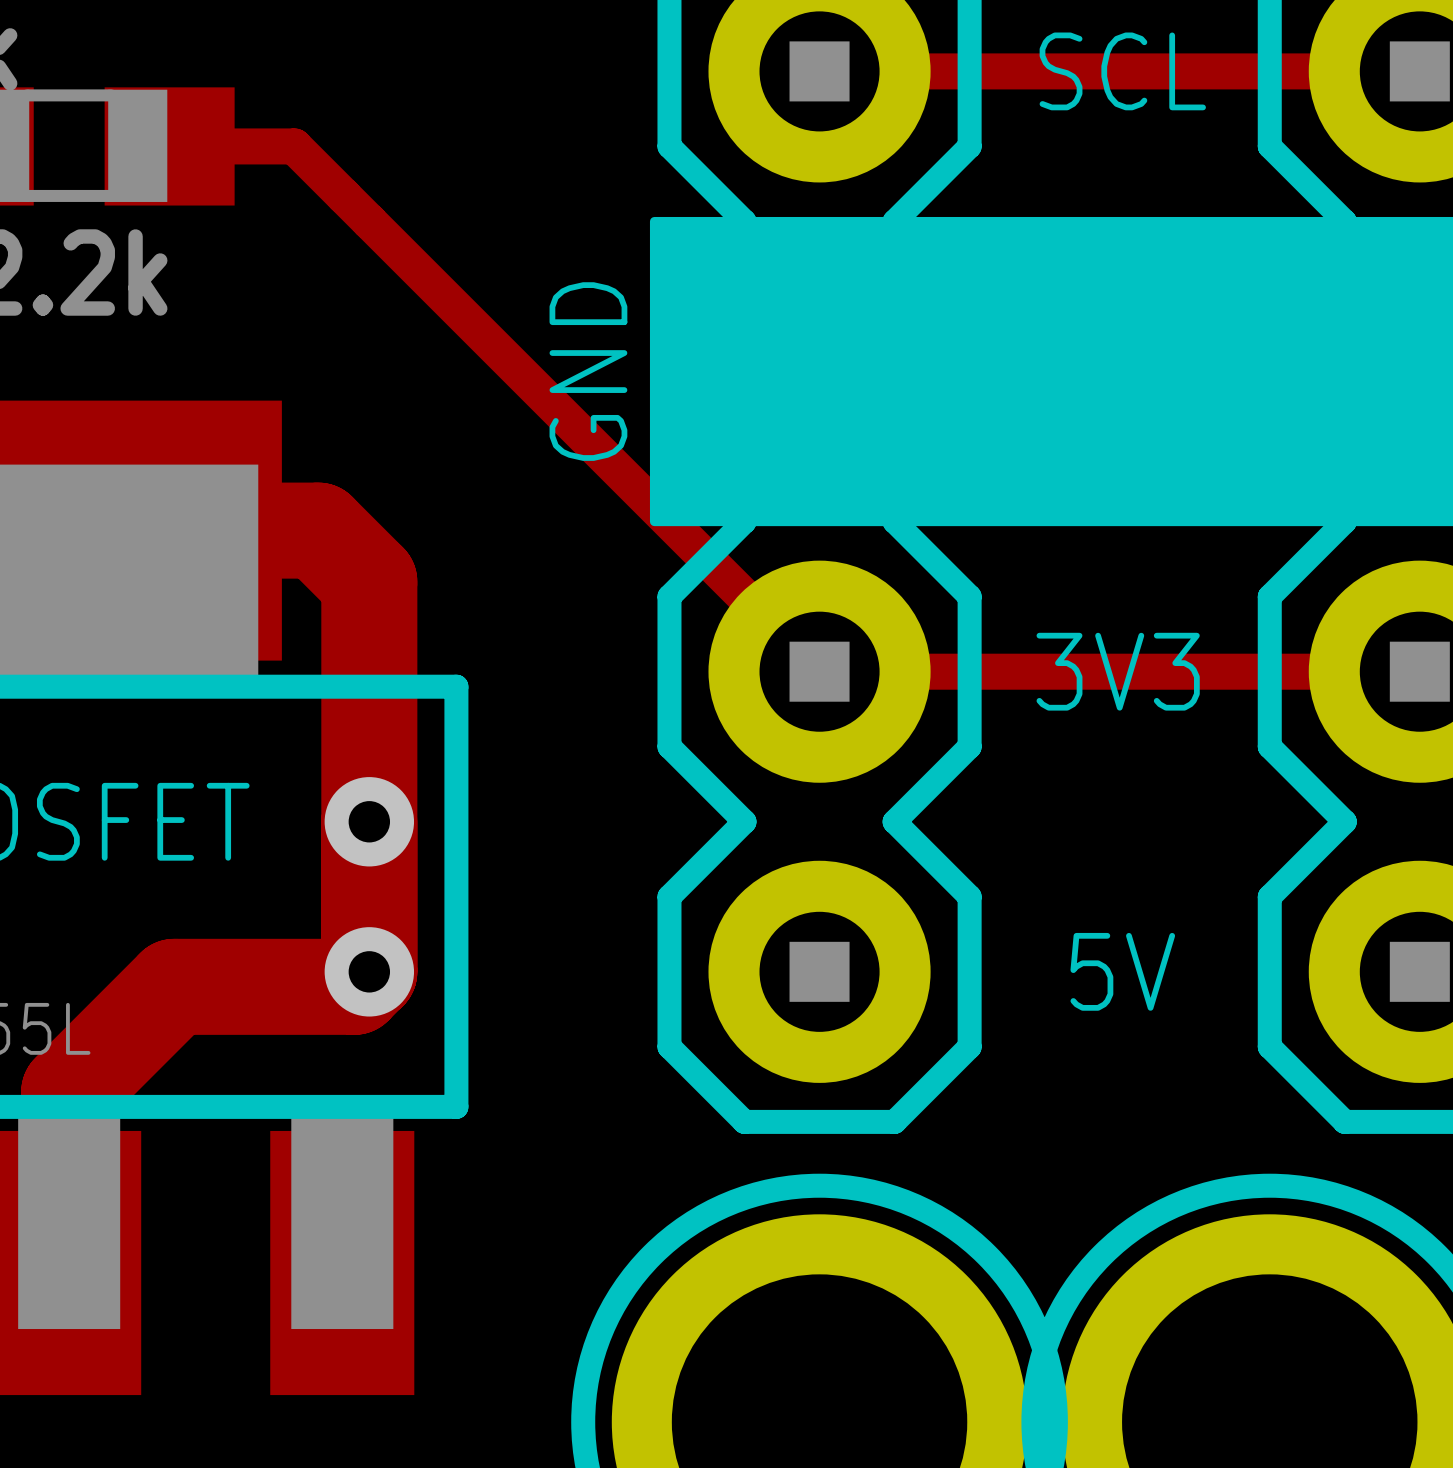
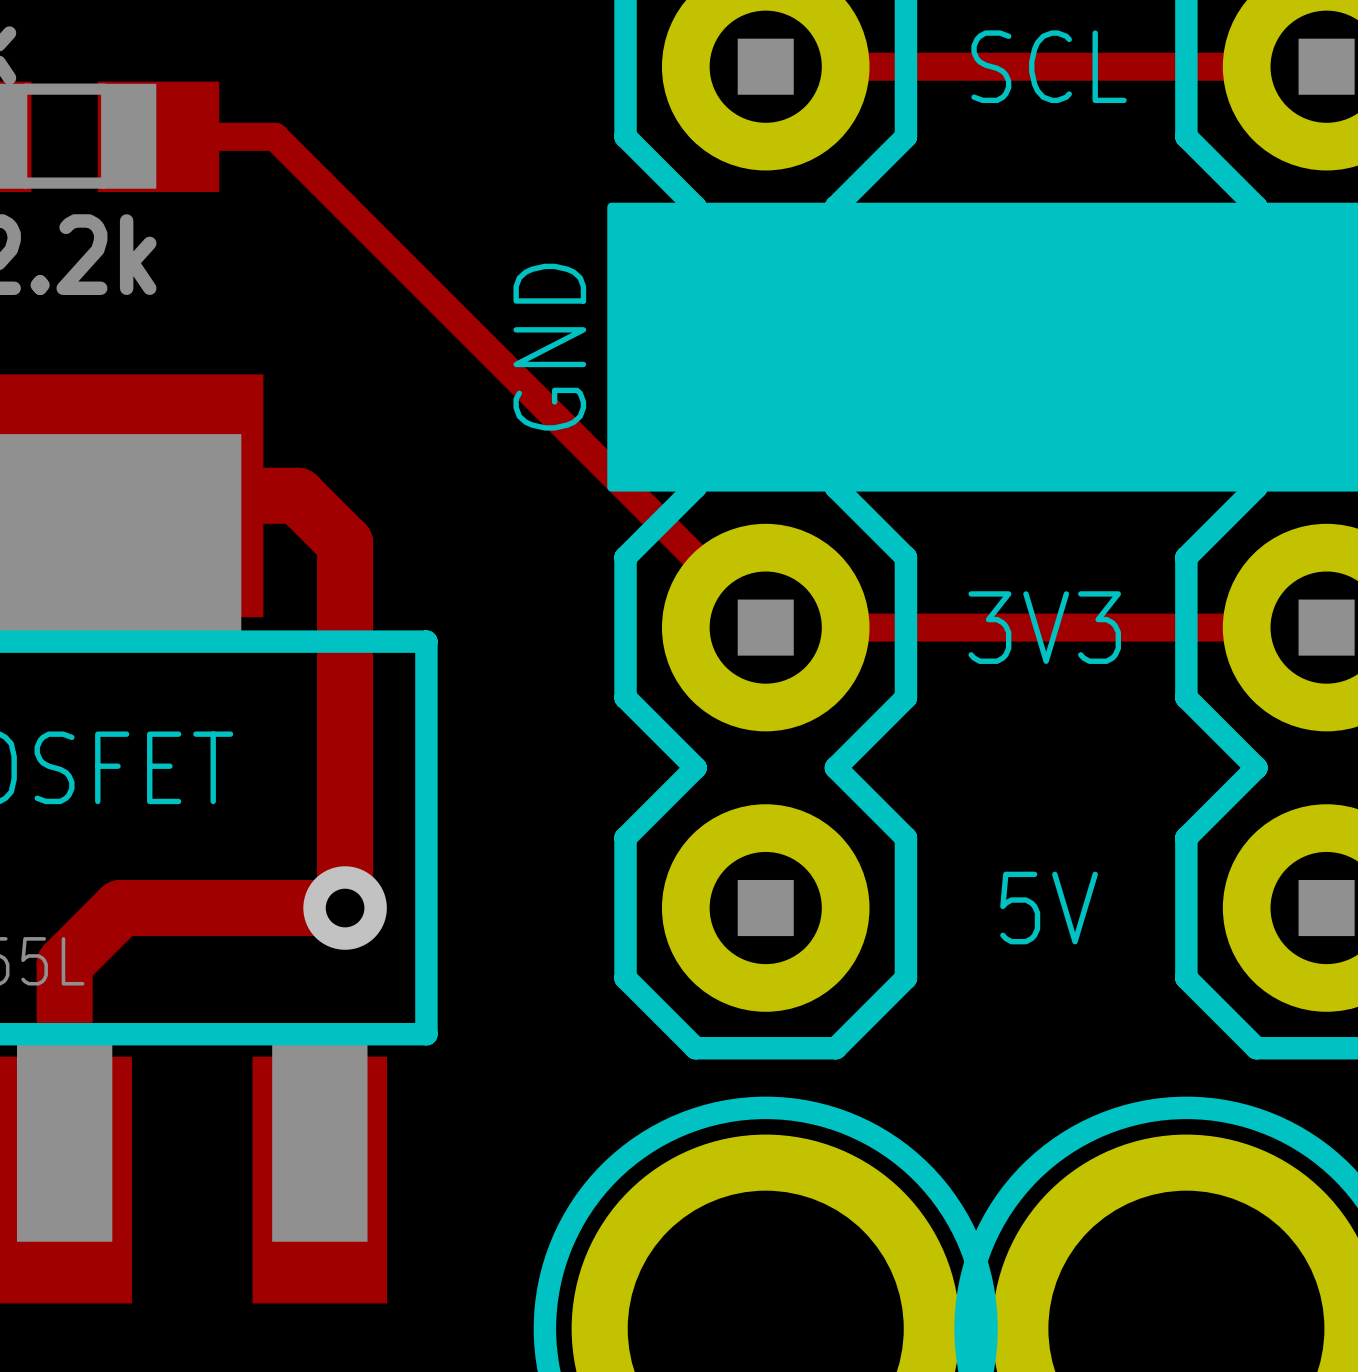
track width: thick (819, 71) (1419, 71) -> thin (765, 66) (1326, 66)
track width: thick (169, 146) (294, 146) (819, 671) (1419, 671) -> thin (158, 136) (274, 136) (765, 627) (1326, 627)
track width: thick (69, 530) (318, 530) (369, 581) (369, 971) -> thin (64, 495) (297, 495) (345, 543) (345, 908)
via: (369, 821) -> none
track: (369, 971) (354, 986) (174, 986) (69, 1091) -> (345, 908) (120, 908) (64, 964) (64, 1020)

